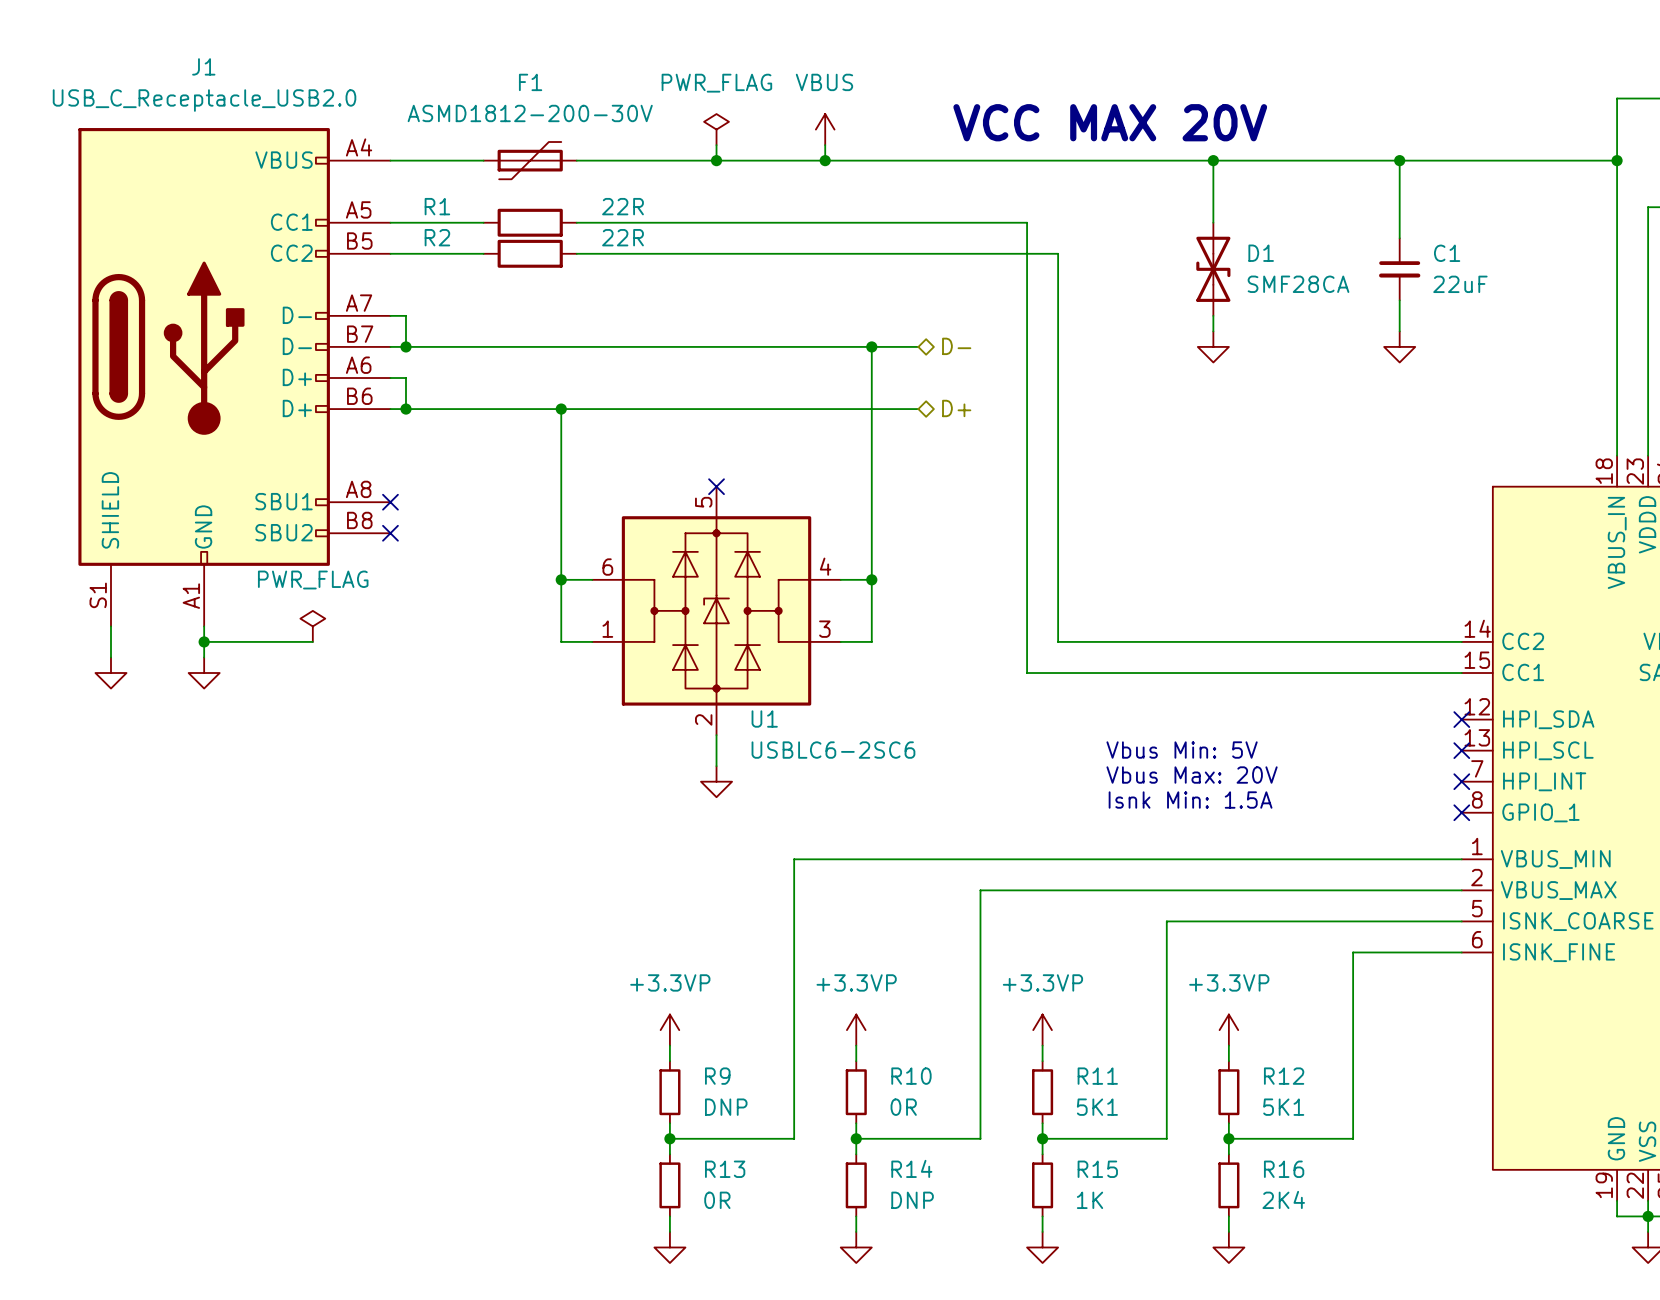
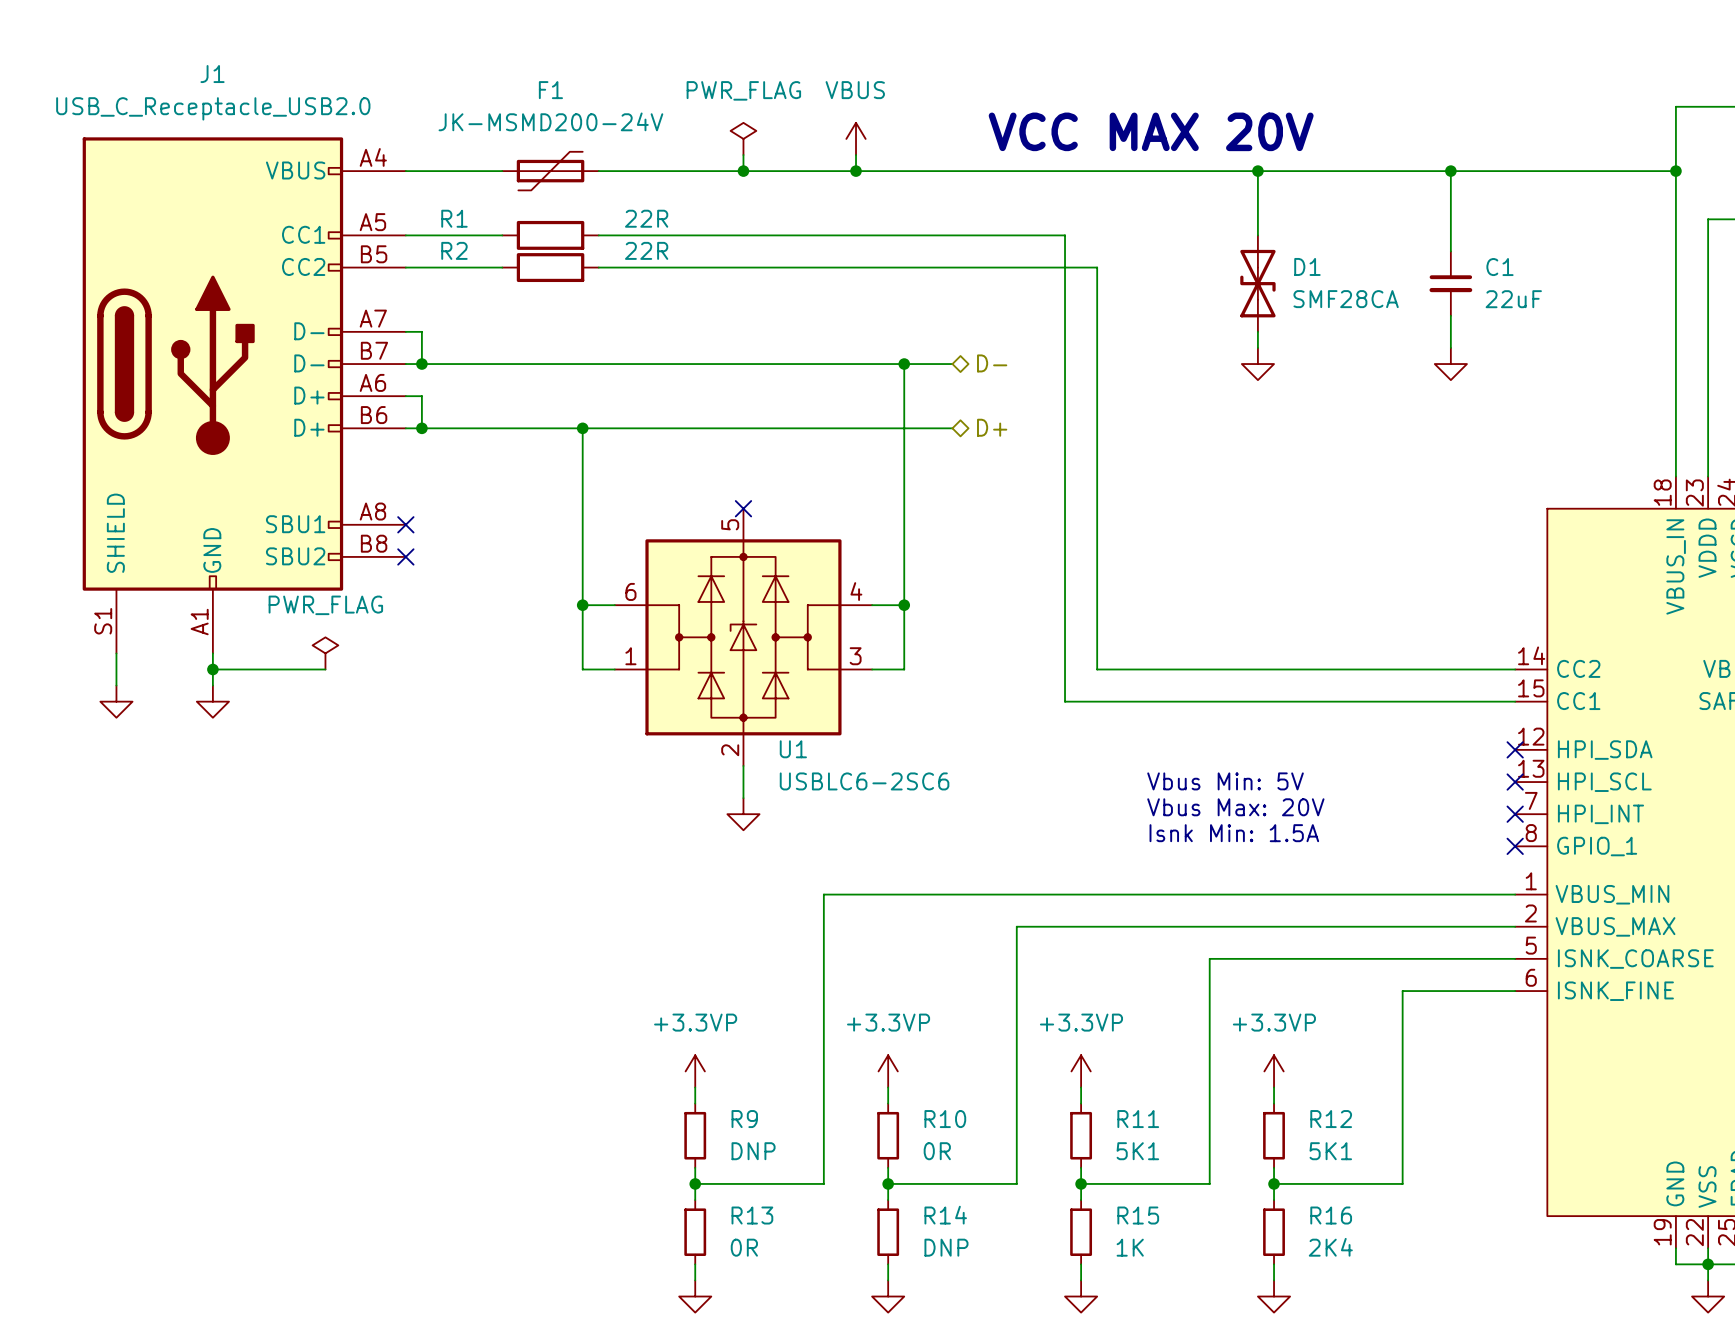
F1 value: ASMD1812-200-30V (530, 113) -> JK-MSMD200-24V (550, 121)

